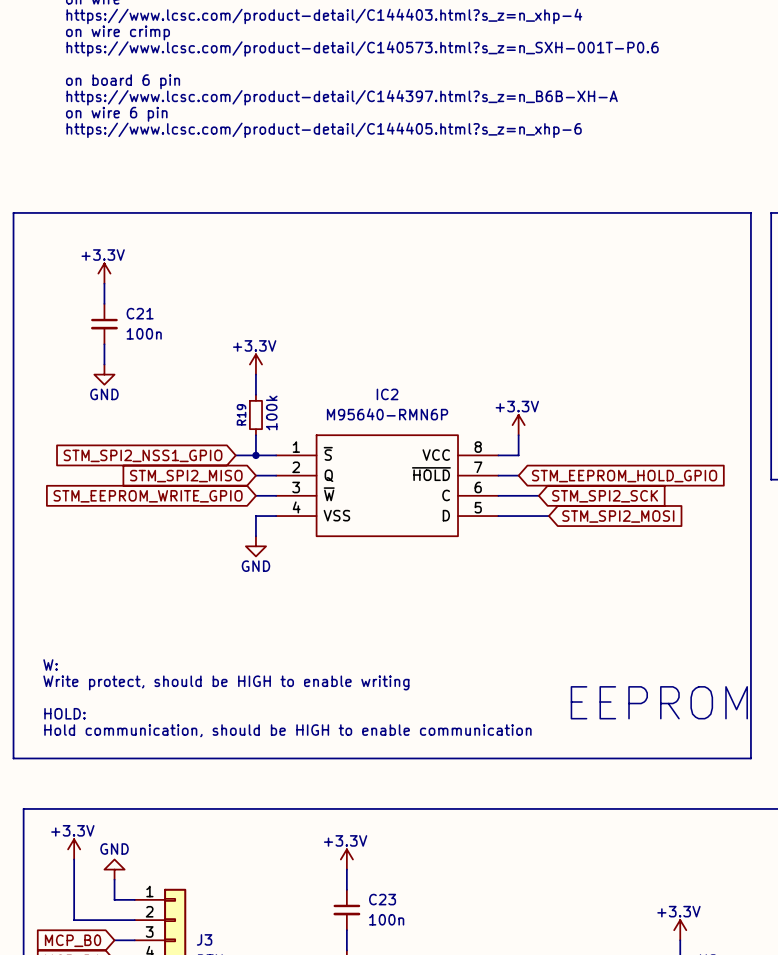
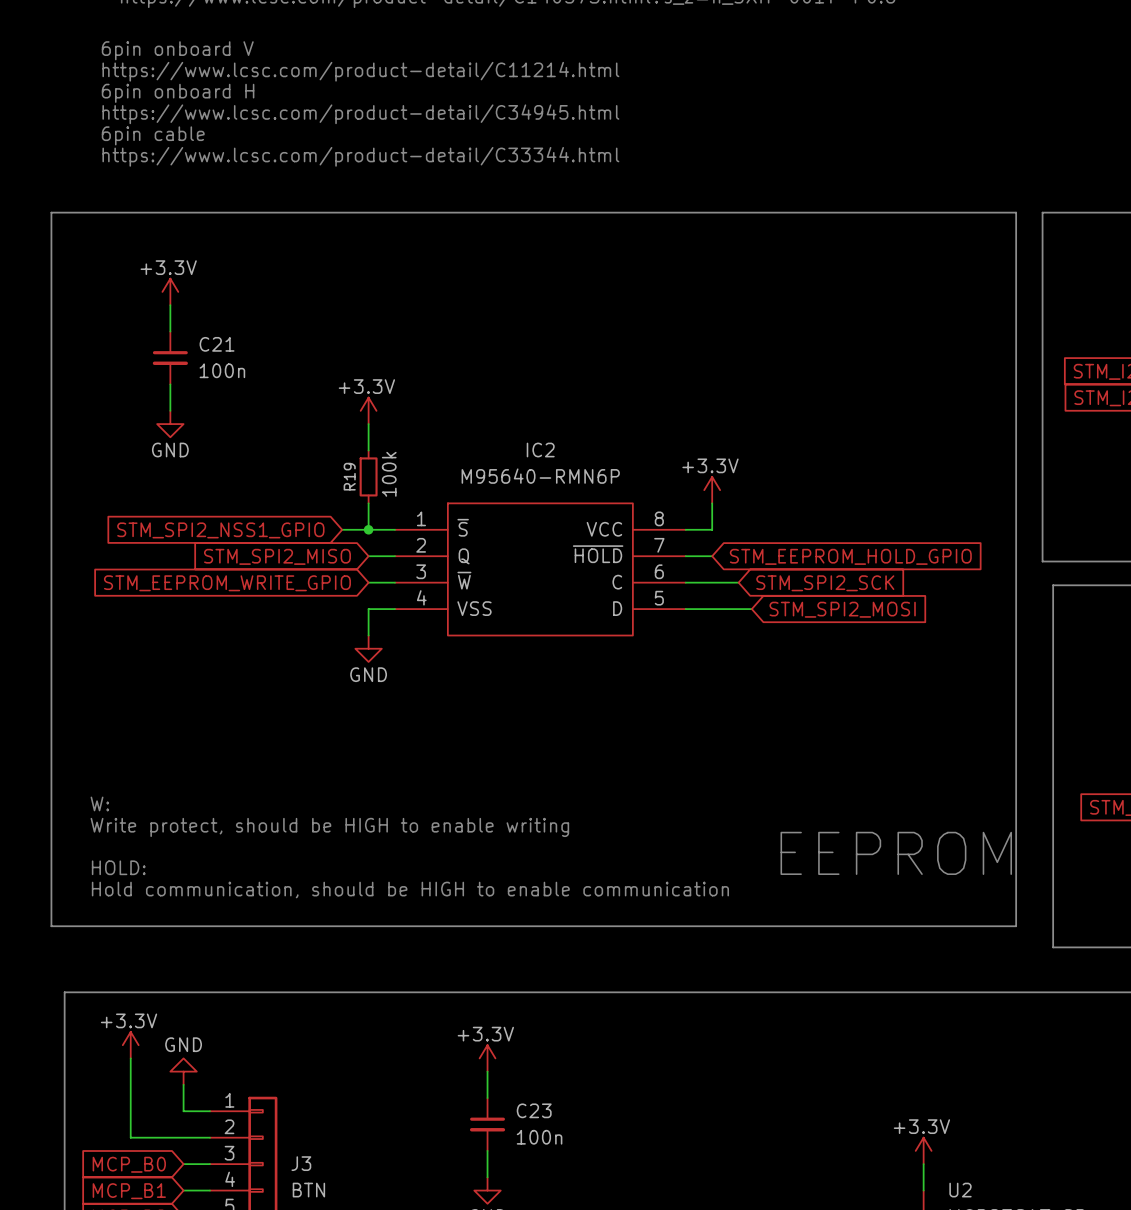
text: on board 6 pin (123, 81) -> none
text: none -> 6pin onboard V (177, 50)
text: https://www.lcsc.com/product-detail/C144397.html?s_z=n_B6B-XH-A (342, 97) -> https://www.lcsc.com/product-detail/C11214.html (360, 71)
text: on wire 6 pin (116, 114) -> none
text: none -> 6pin onboard H (178, 93)
text: https://www.lcsc.com/product-detail/C144405.html?s_z=n_xhp-6 (324, 130) -> https://www.lcsc.com/product-detail/C34945.html (360, 114)
text: none -> 6pin cable (153, 135)
text: none -> https://www.lcsc.com/product-detail/C33344.html (360, 156)

